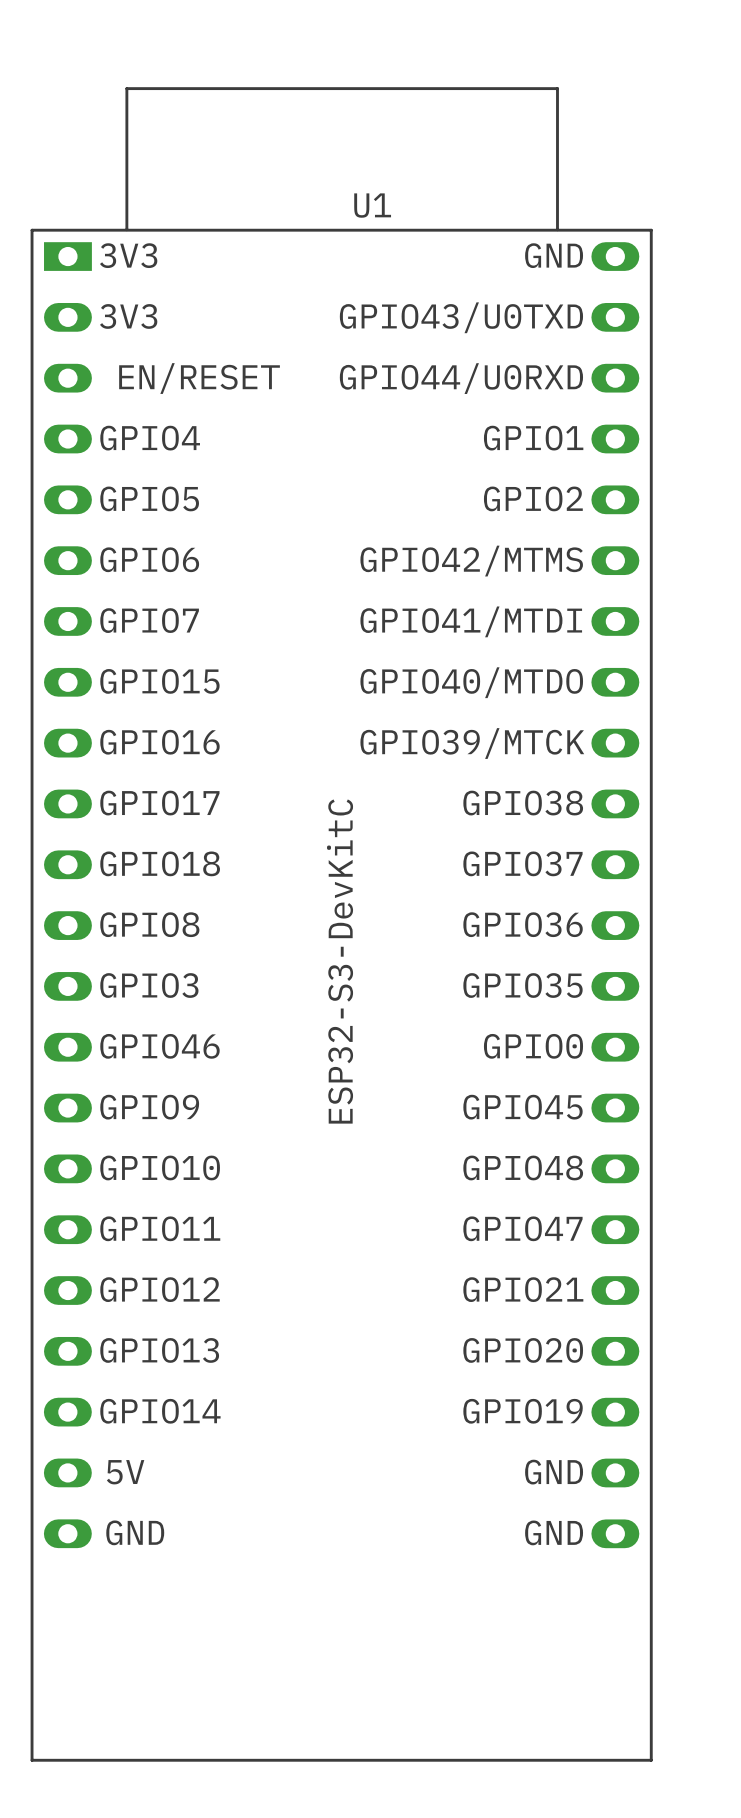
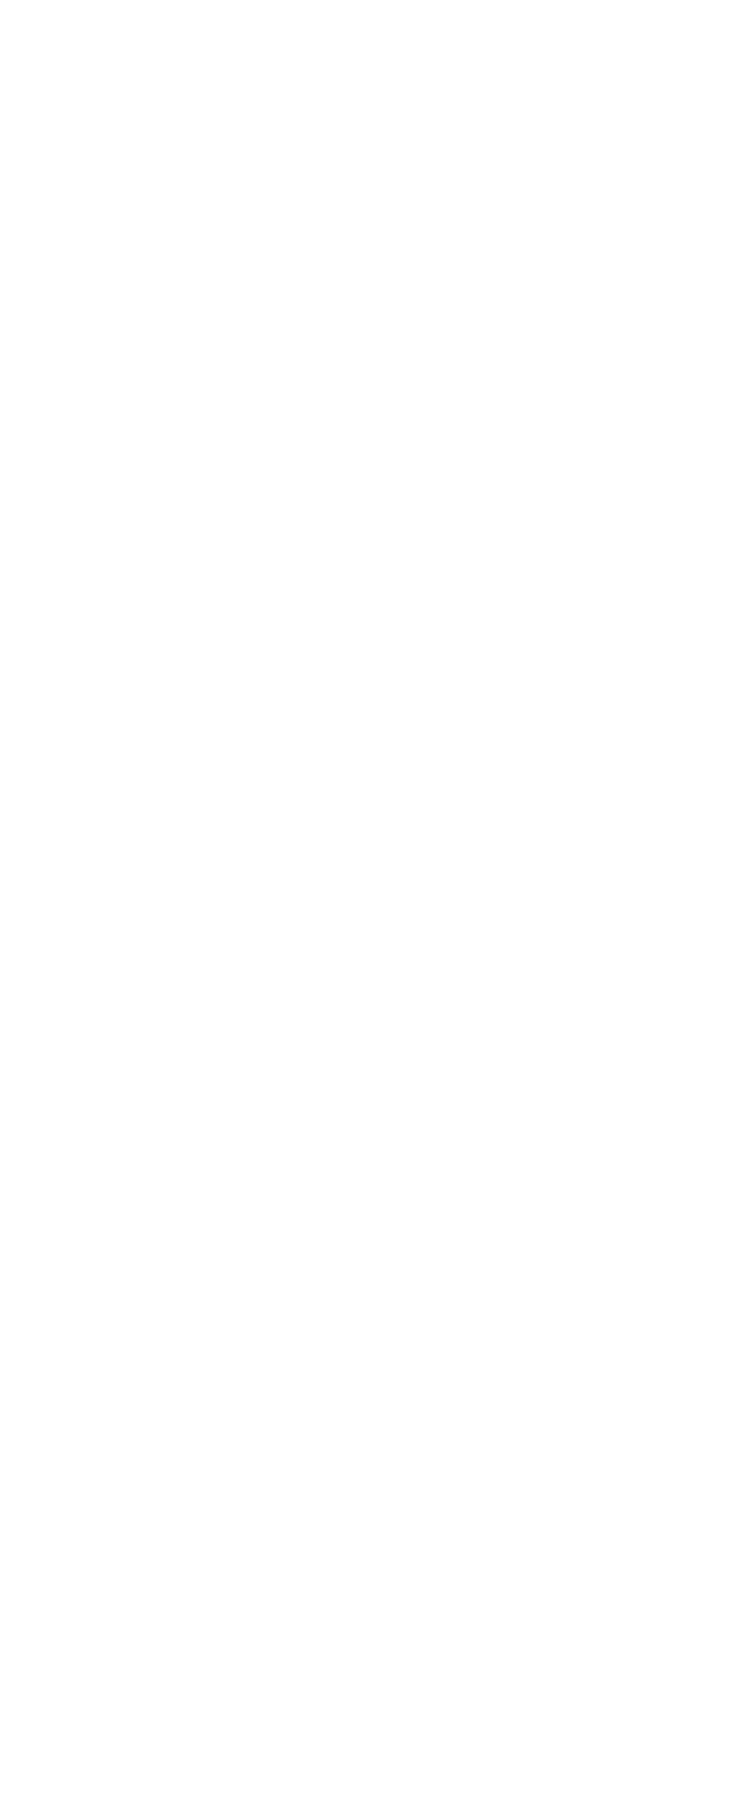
U1: ESP32-S3-DevKitC (341, 924) -> none

